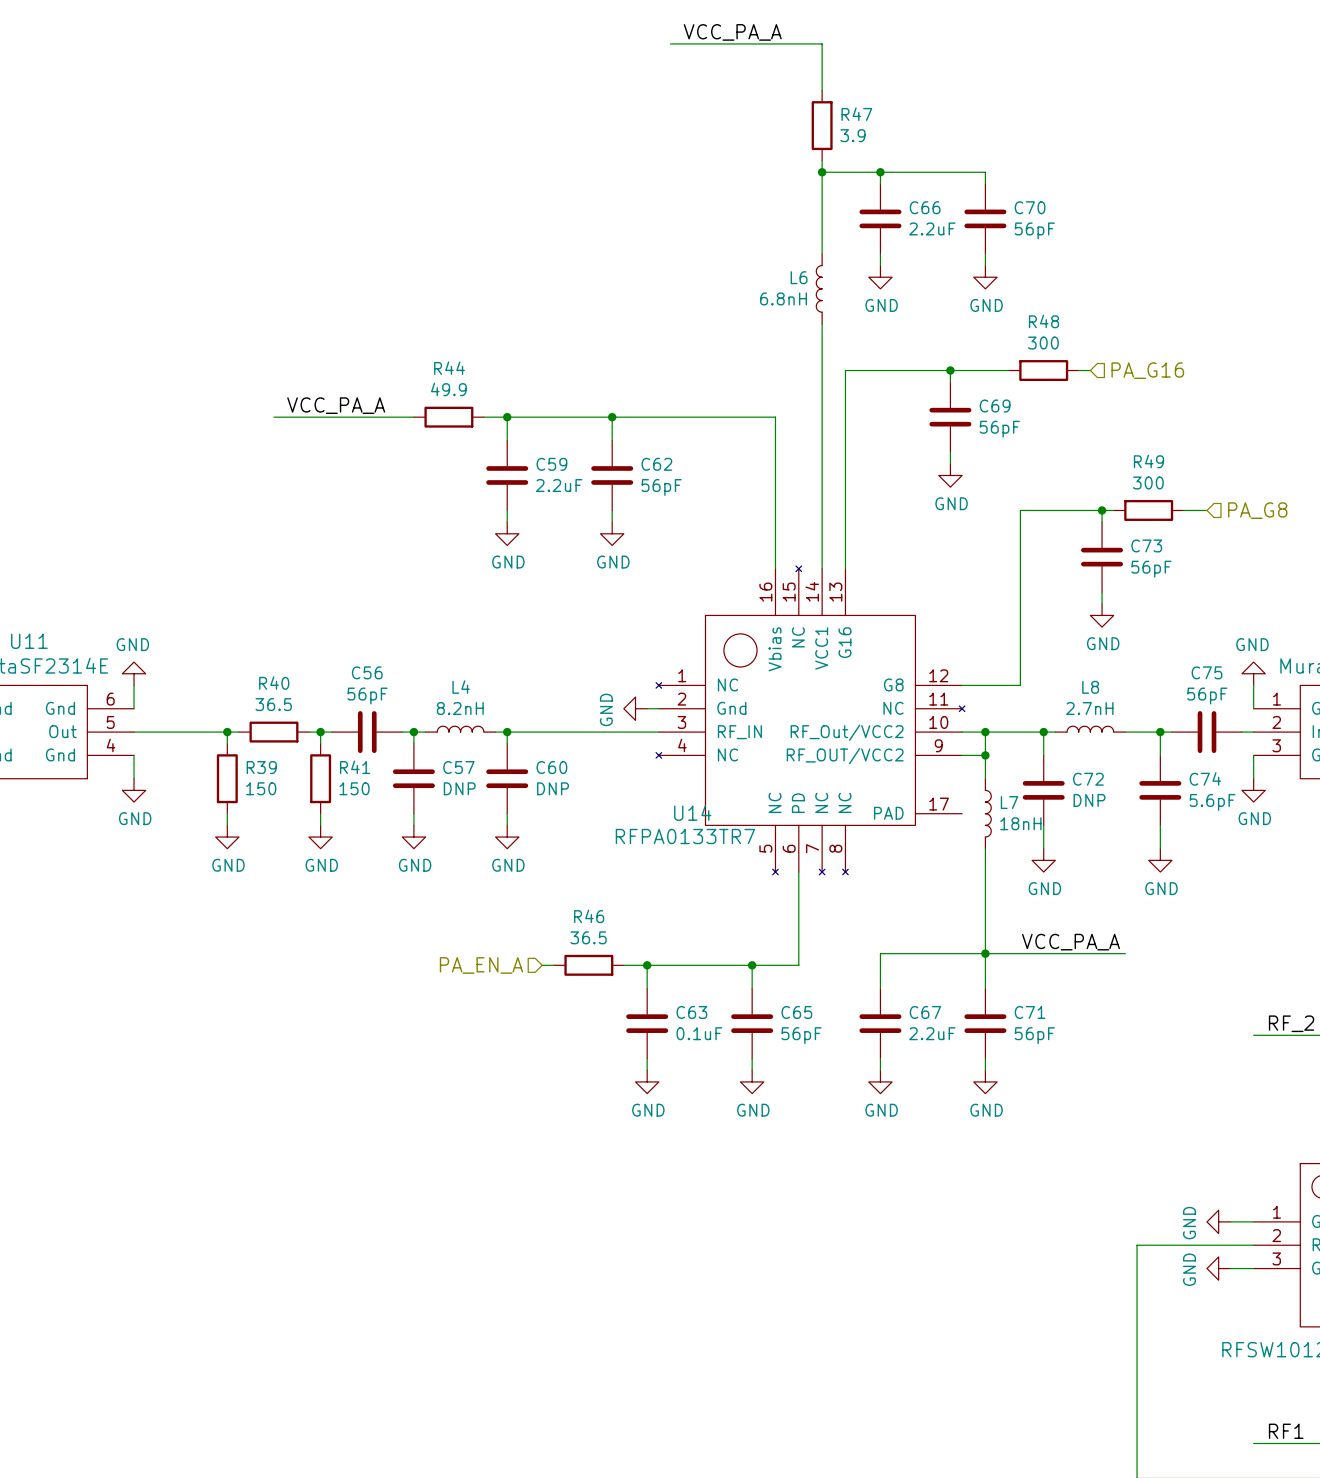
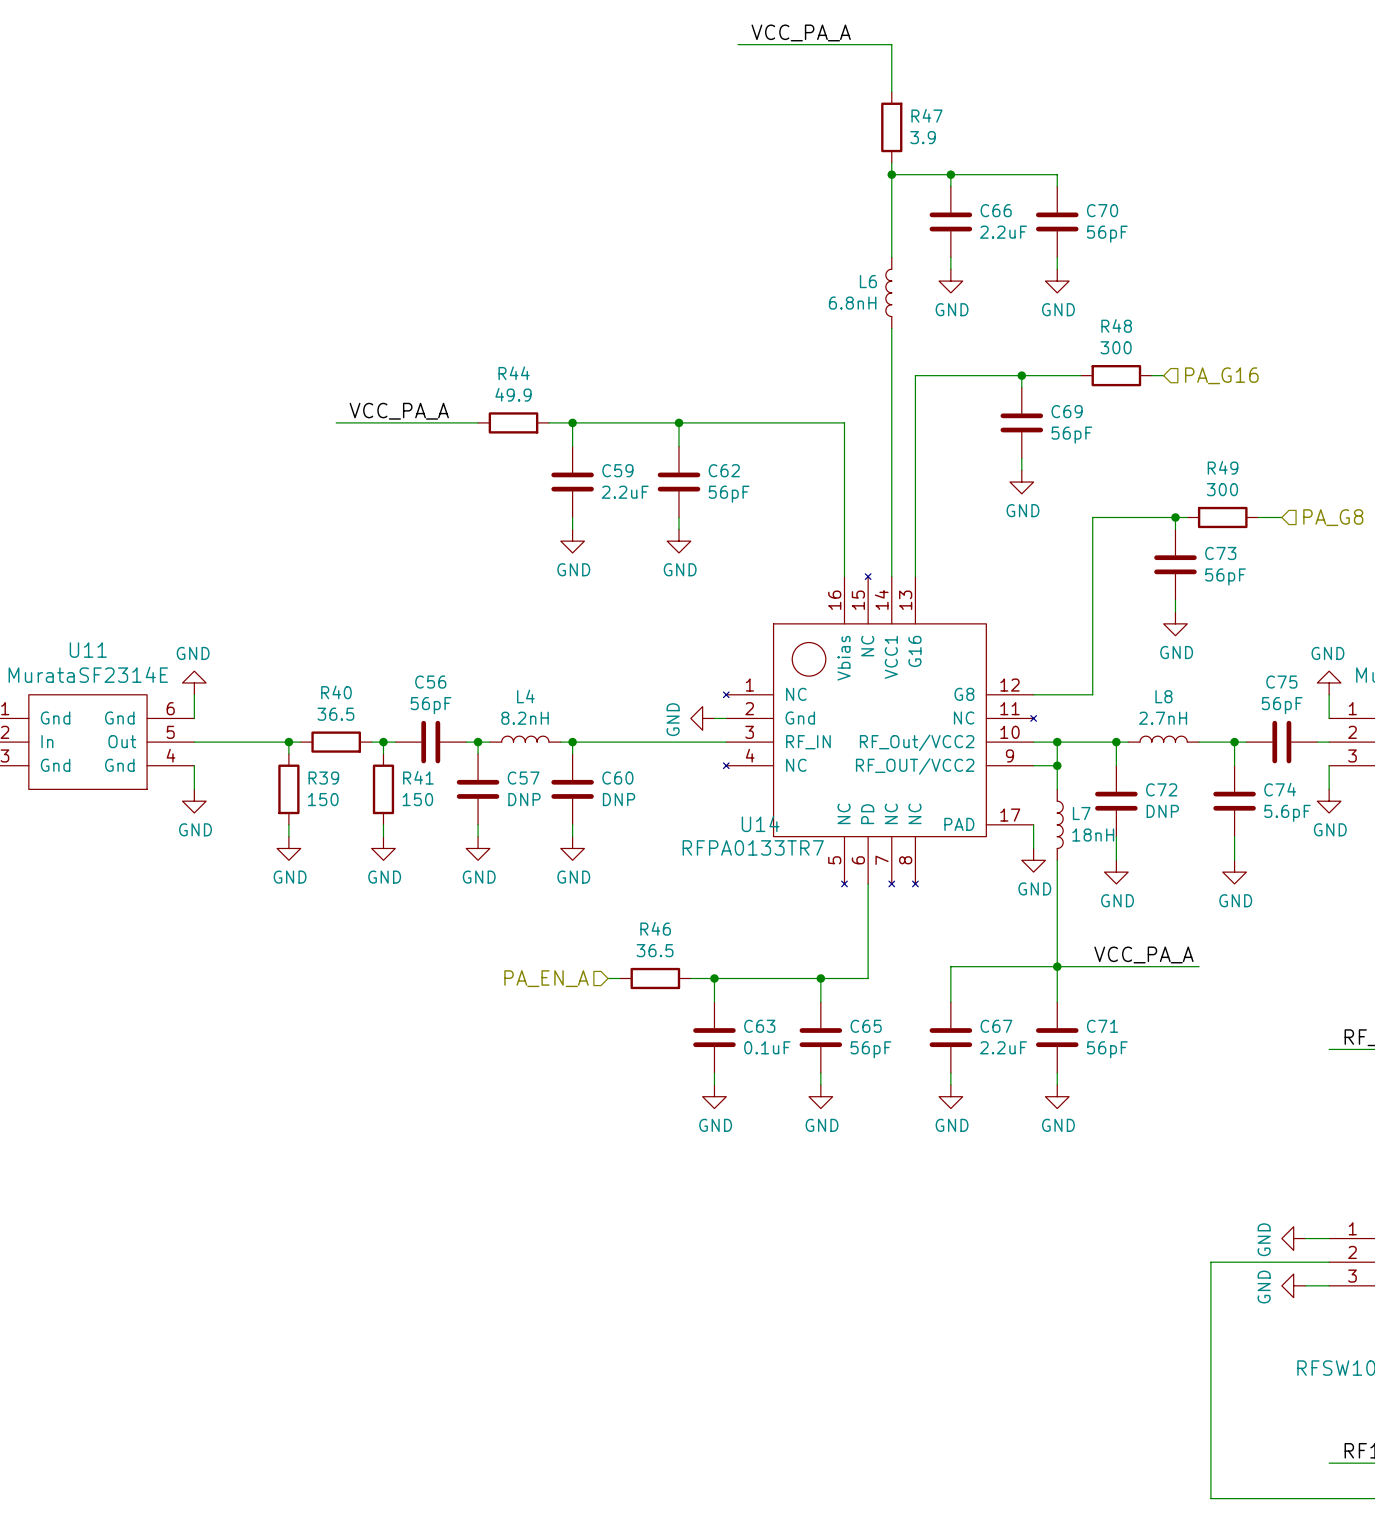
wire: none -> (1033, 824) (1033, 848)
power symbol: none -> GND (1033, 860)

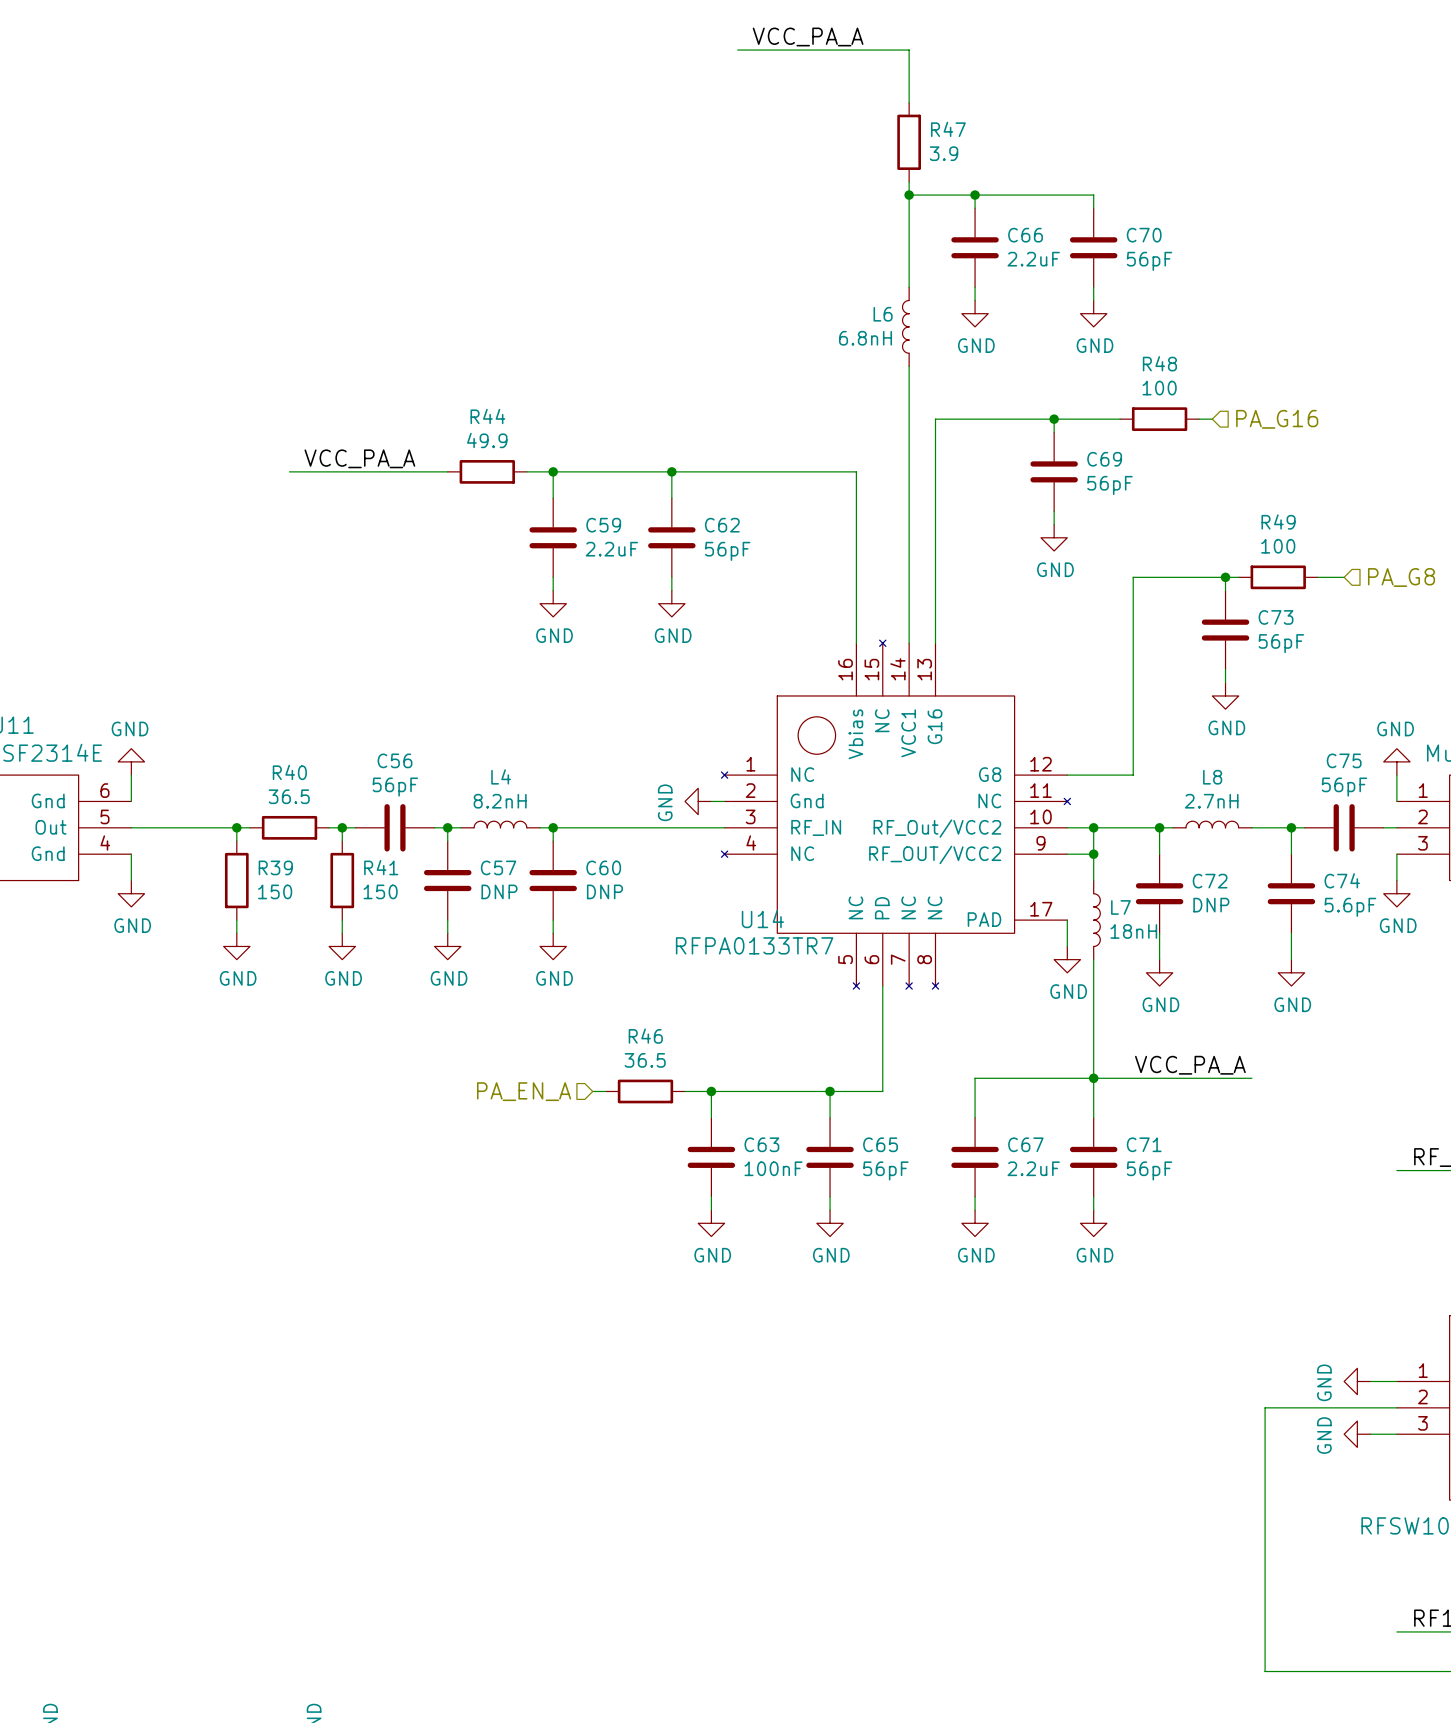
R48 value: 300 (1116, 347) -> 100 (1159, 388)
R49 value: 300 (1222, 489) -> 100 (1278, 546)
C63 value: 0.1uF (767, 1047) -> 100nF (773, 1168)

